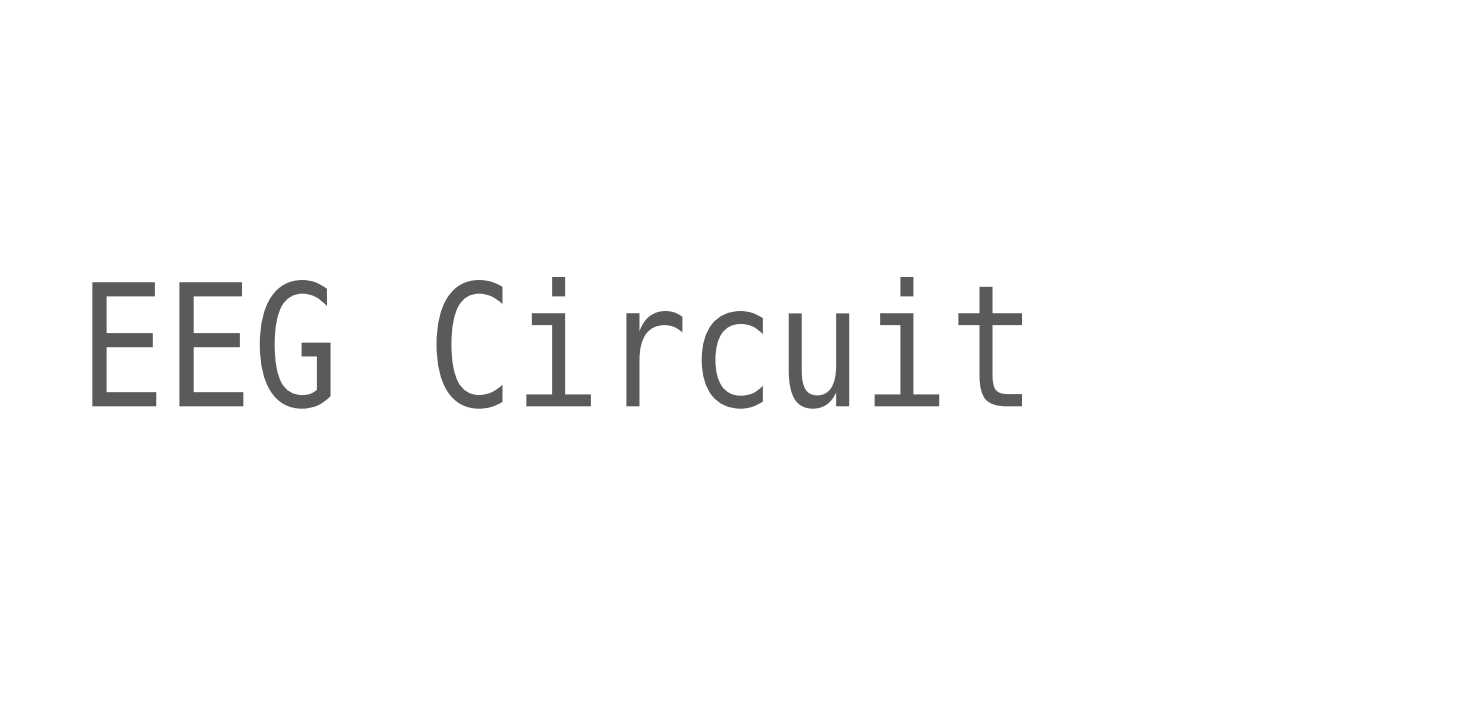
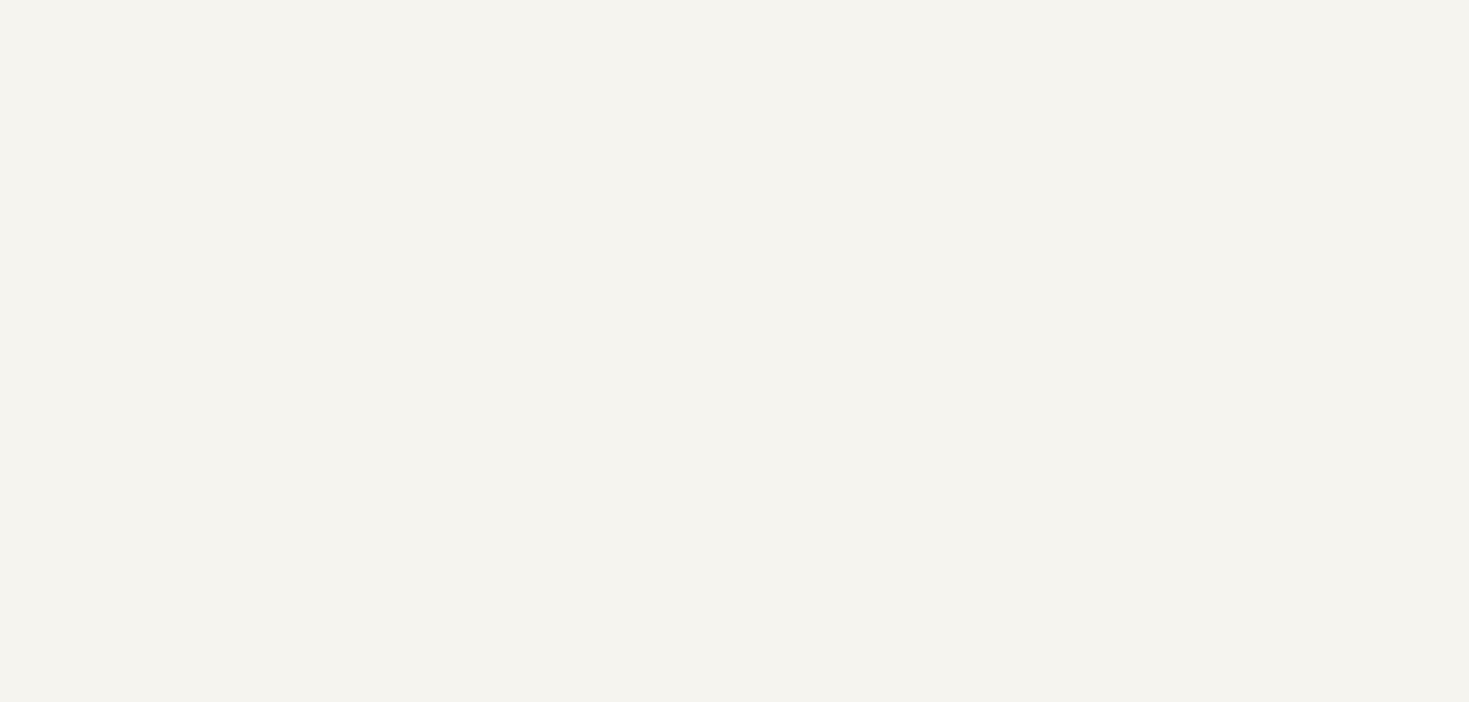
text: EEG Circuit (557, 342) -> none

